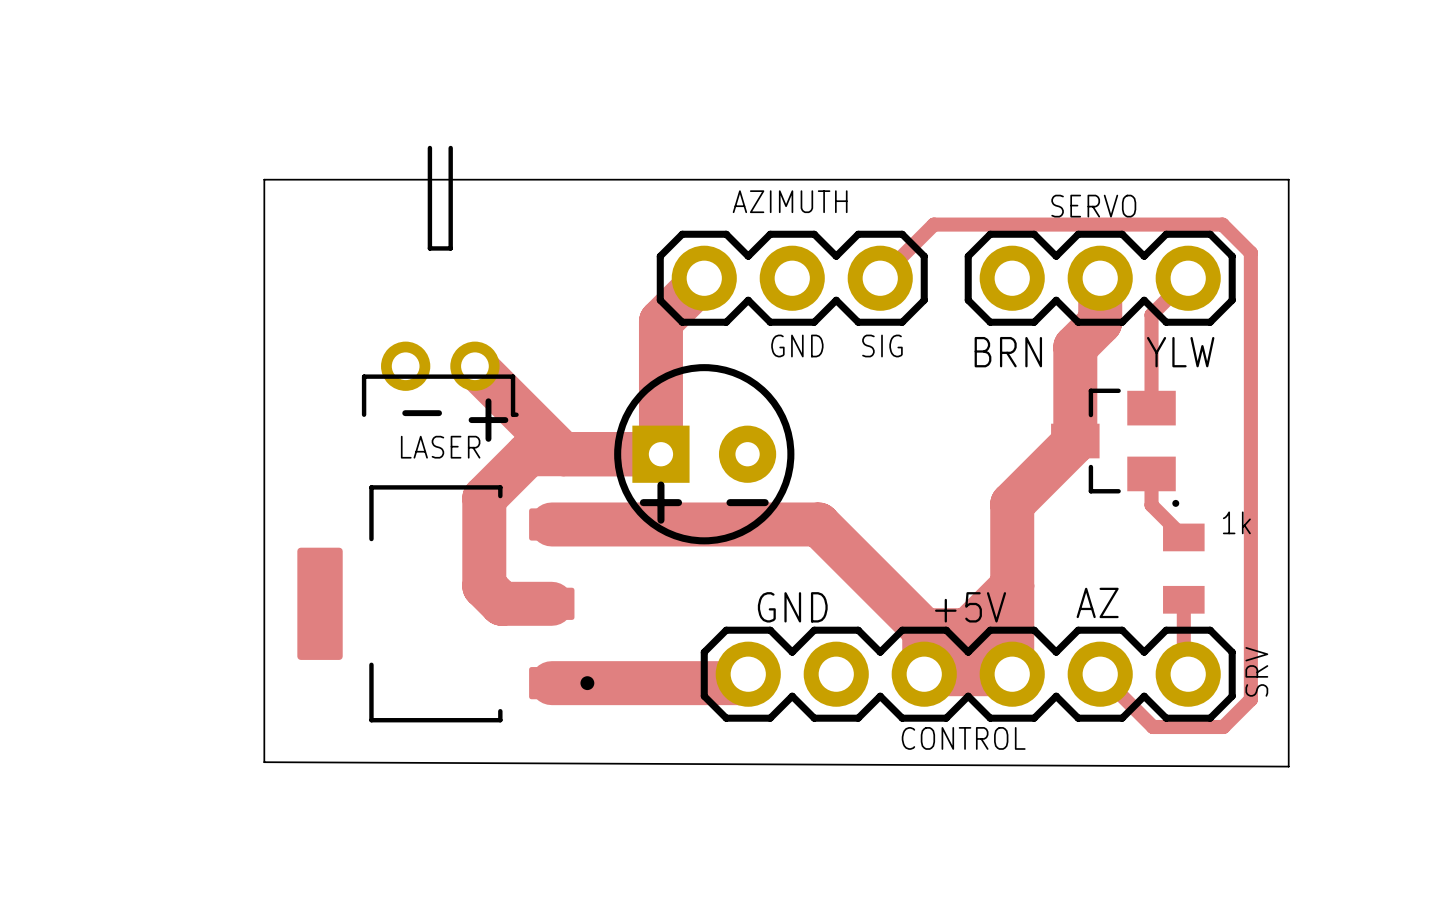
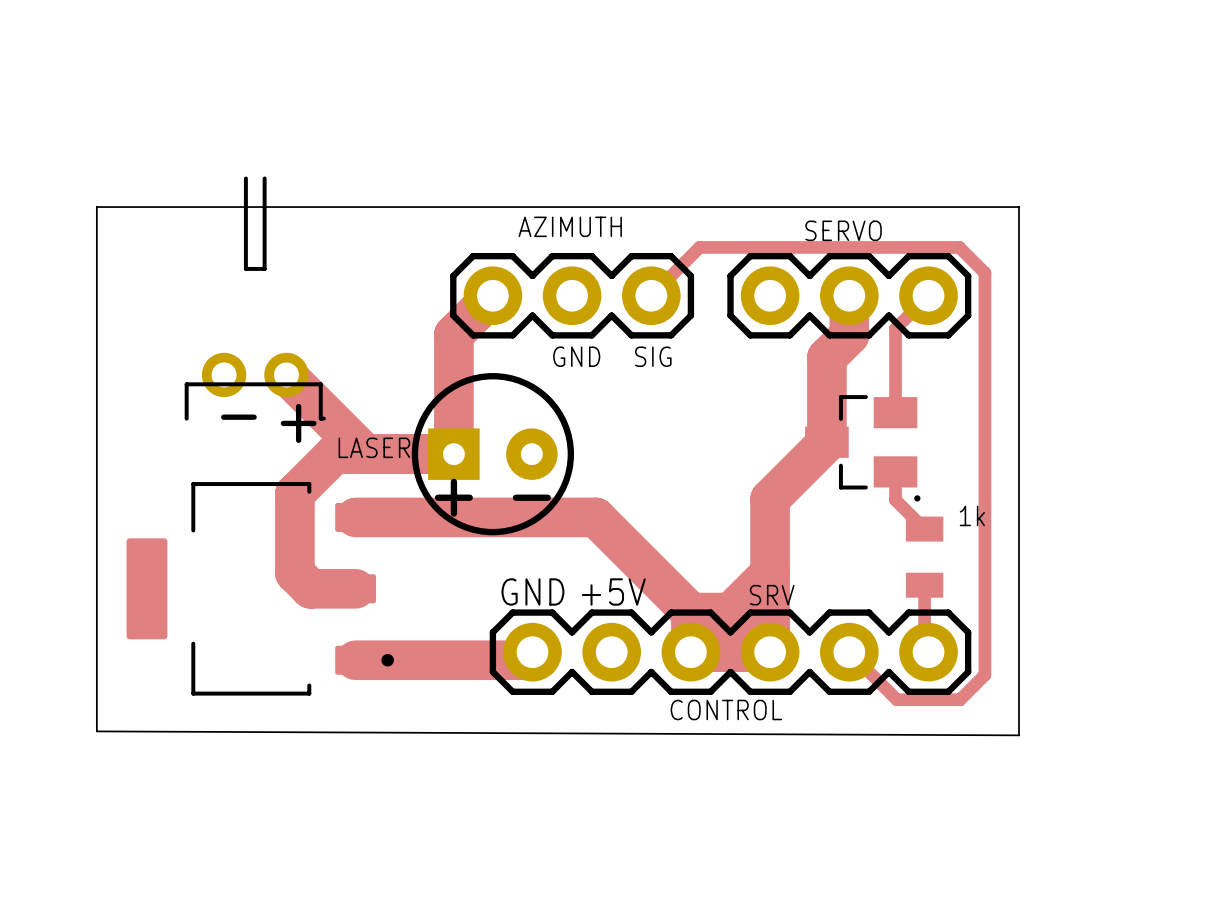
text: BRN (1008, 352) -> none
text: YLW (1180, 352) -> none
text position: LASER (440, 447) -> LASER (374, 447)
text: AZ (1097, 602) -> none
text position: GND (792, 607) -> GND (532, 591)
text position: +5V (970, 607) -> +5V (613, 591)
text rotation: 0° (1256, 671) -> 90° clockwise (772, 595)
text position: SRV (1256, 671) -> SRV (772, 595)

